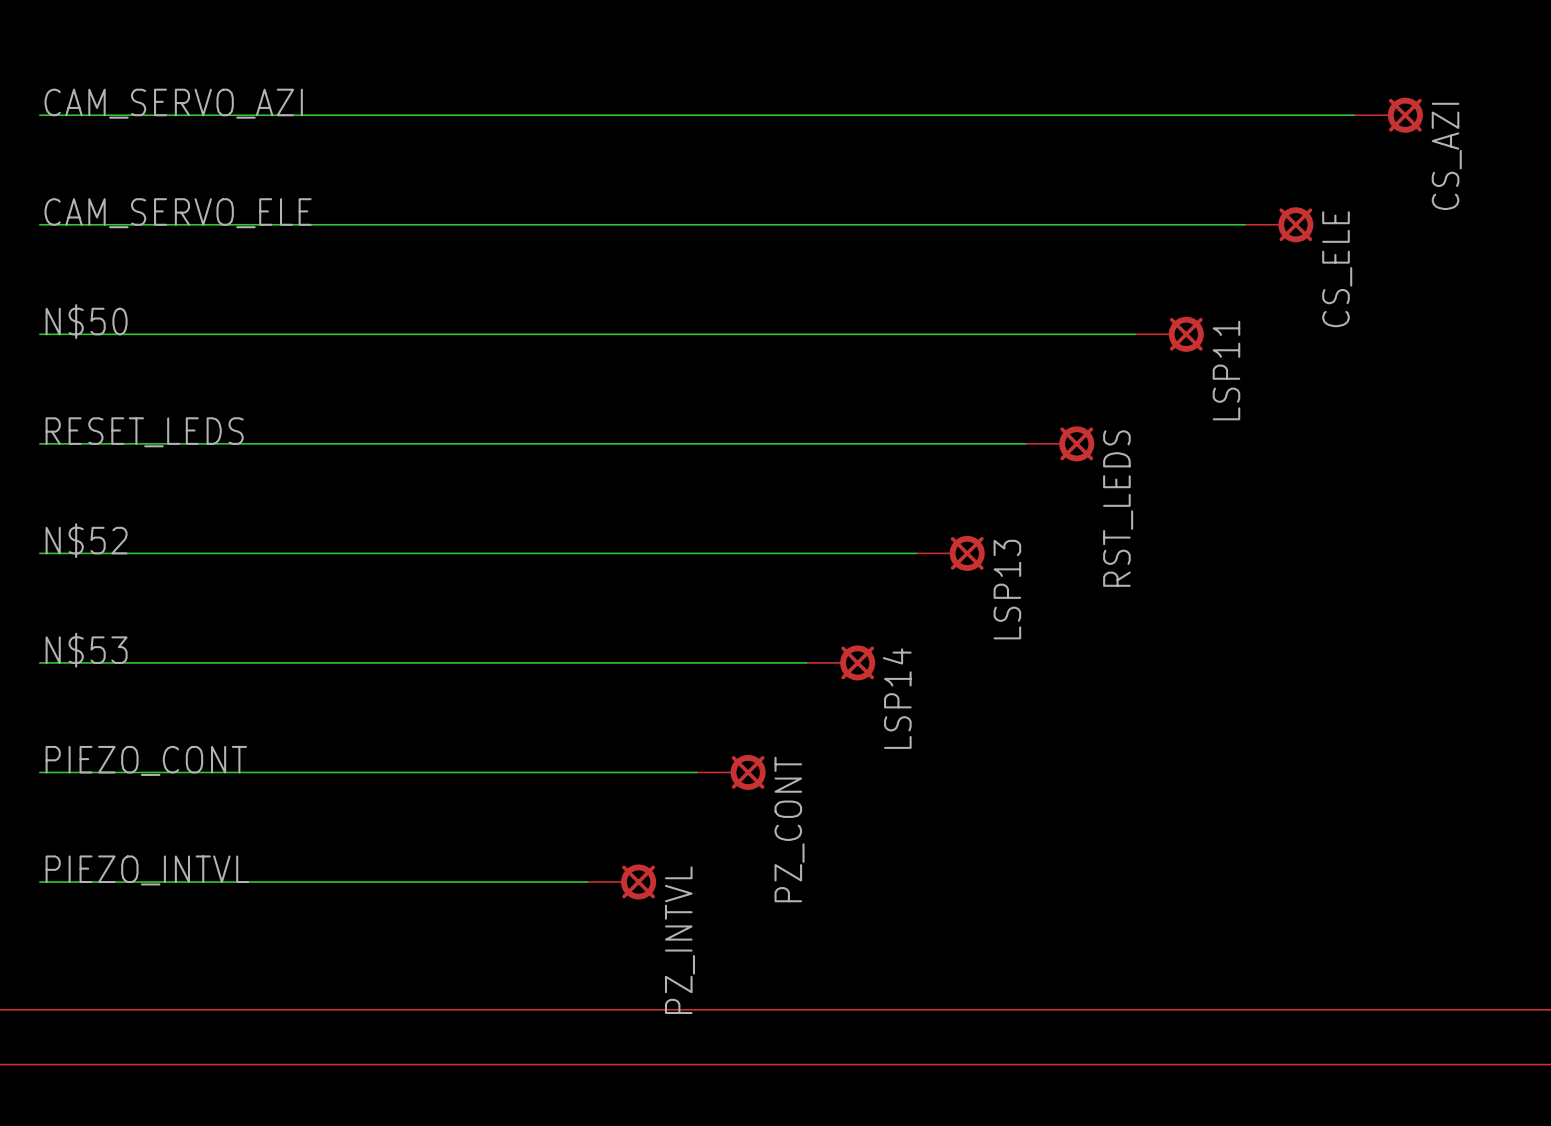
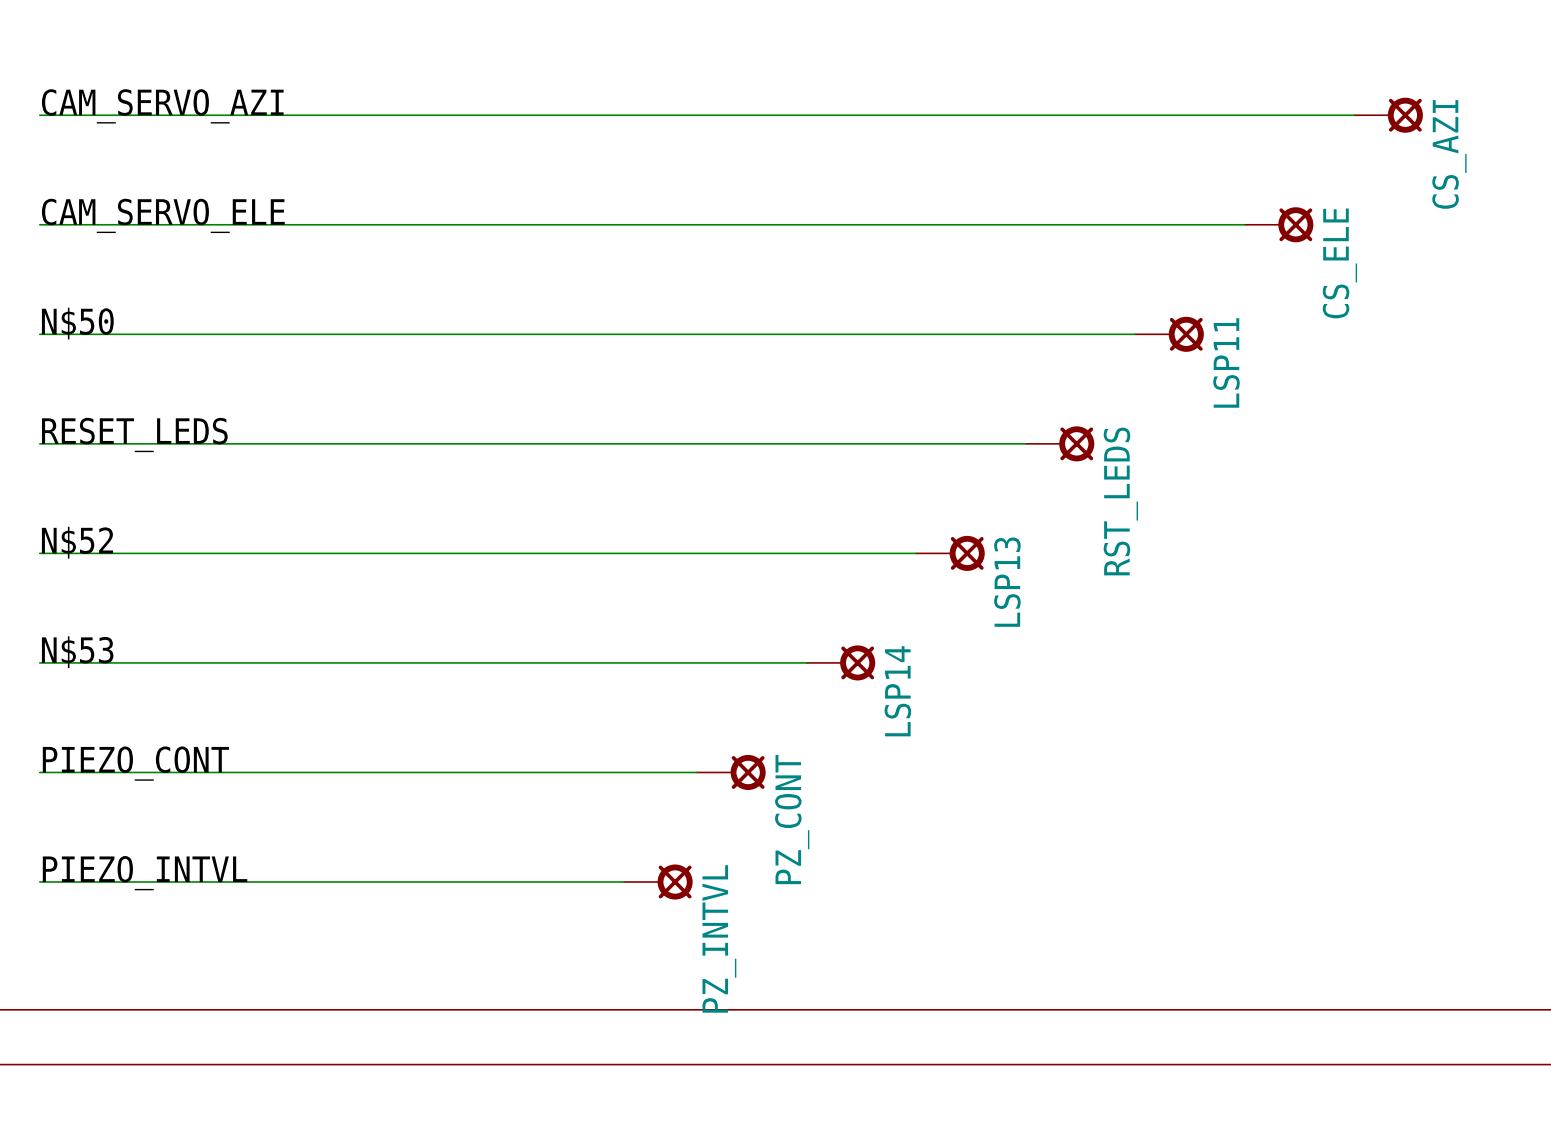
PZ_INTVL position: (621, 882) -> (658, 882)

